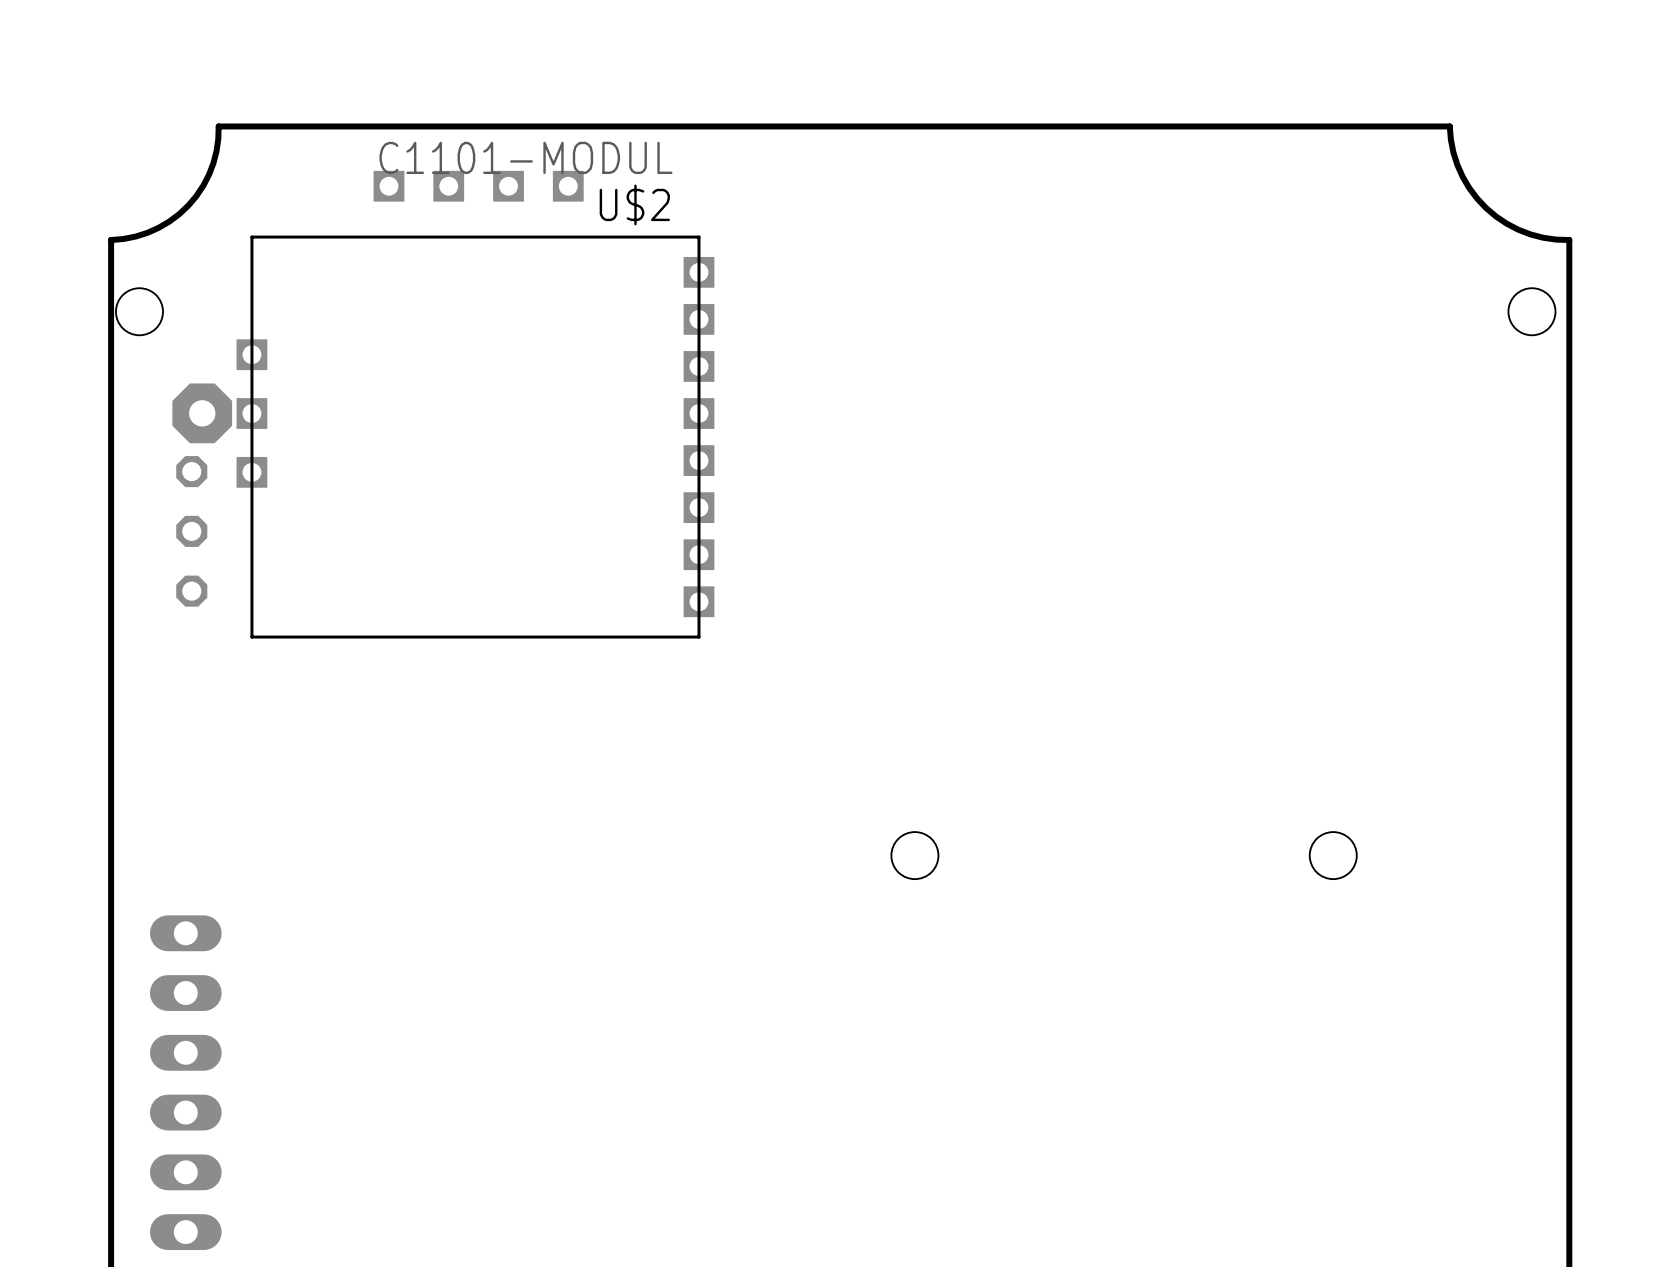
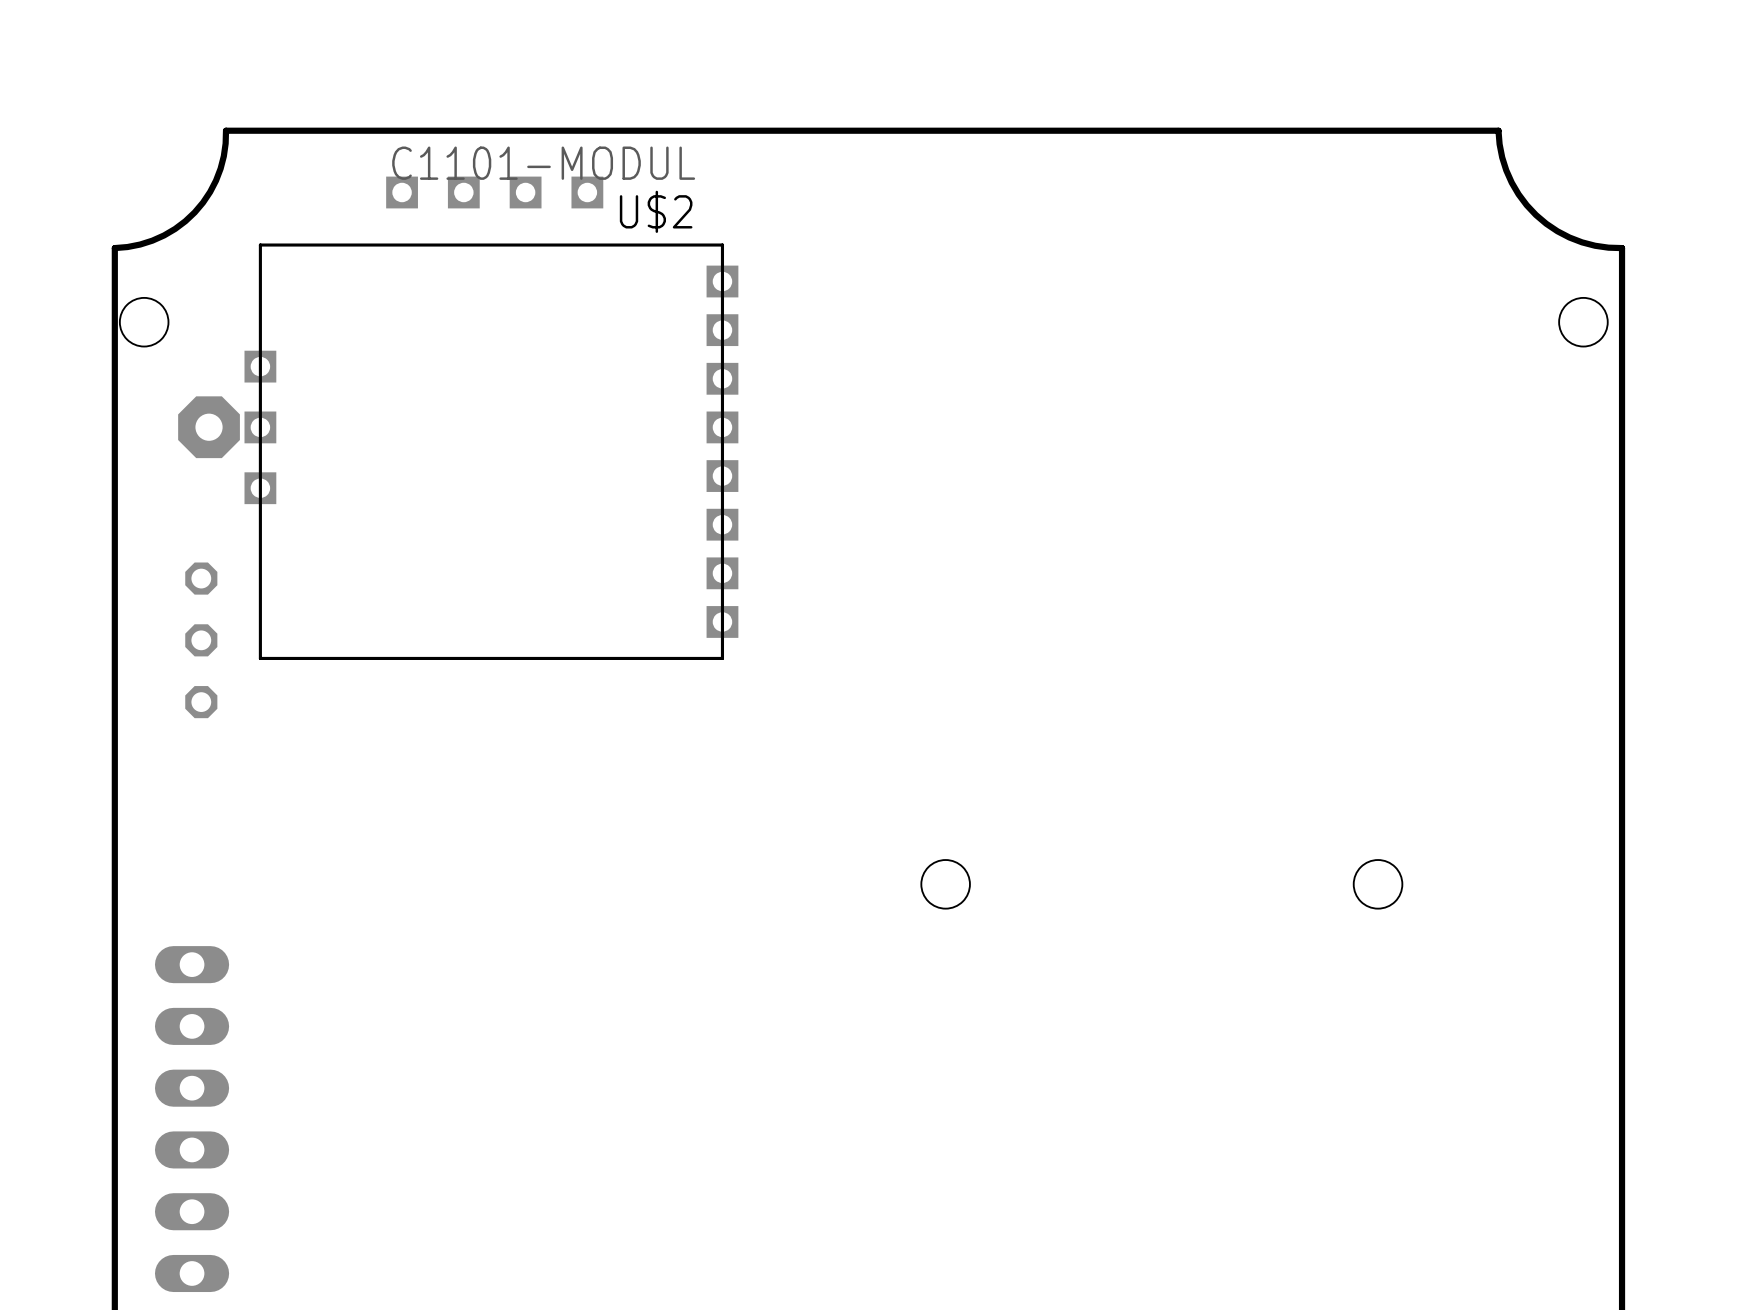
part position: (191, 531) -> (201, 640)

